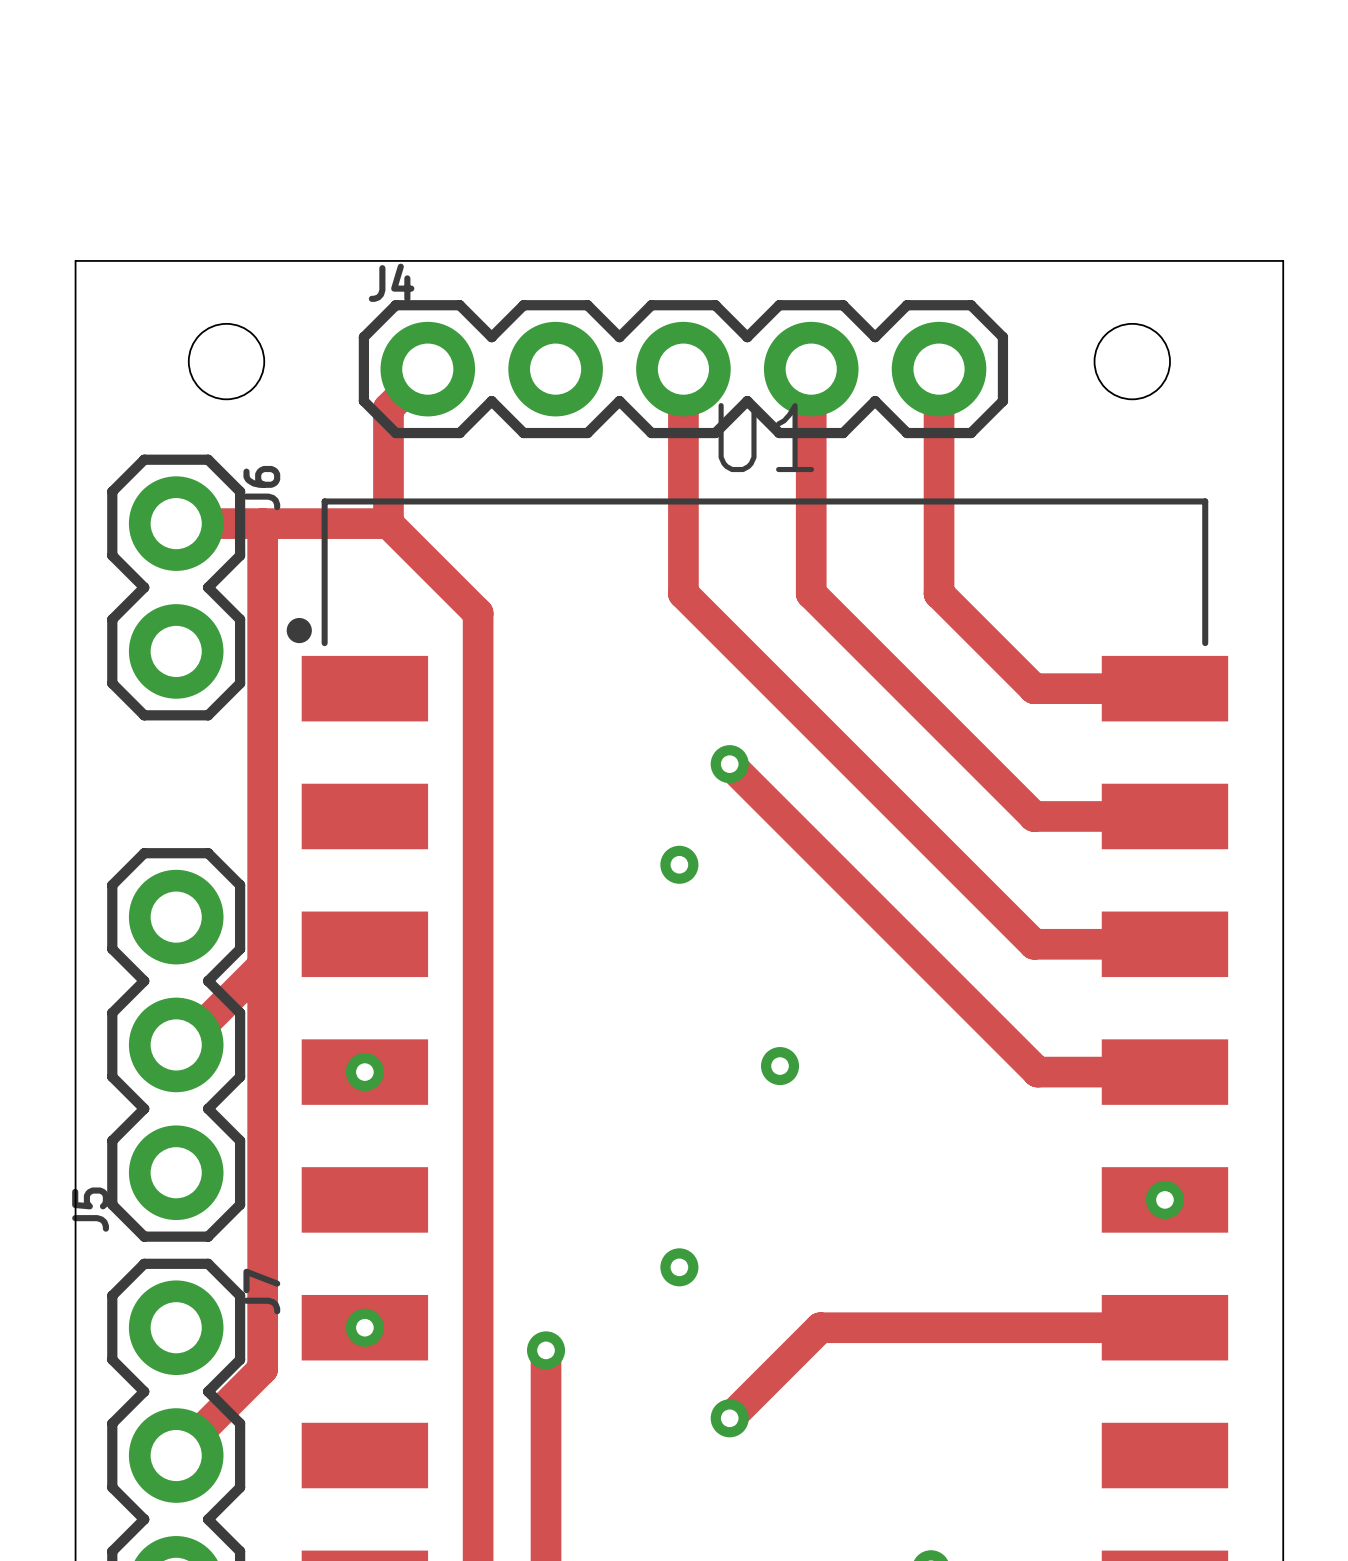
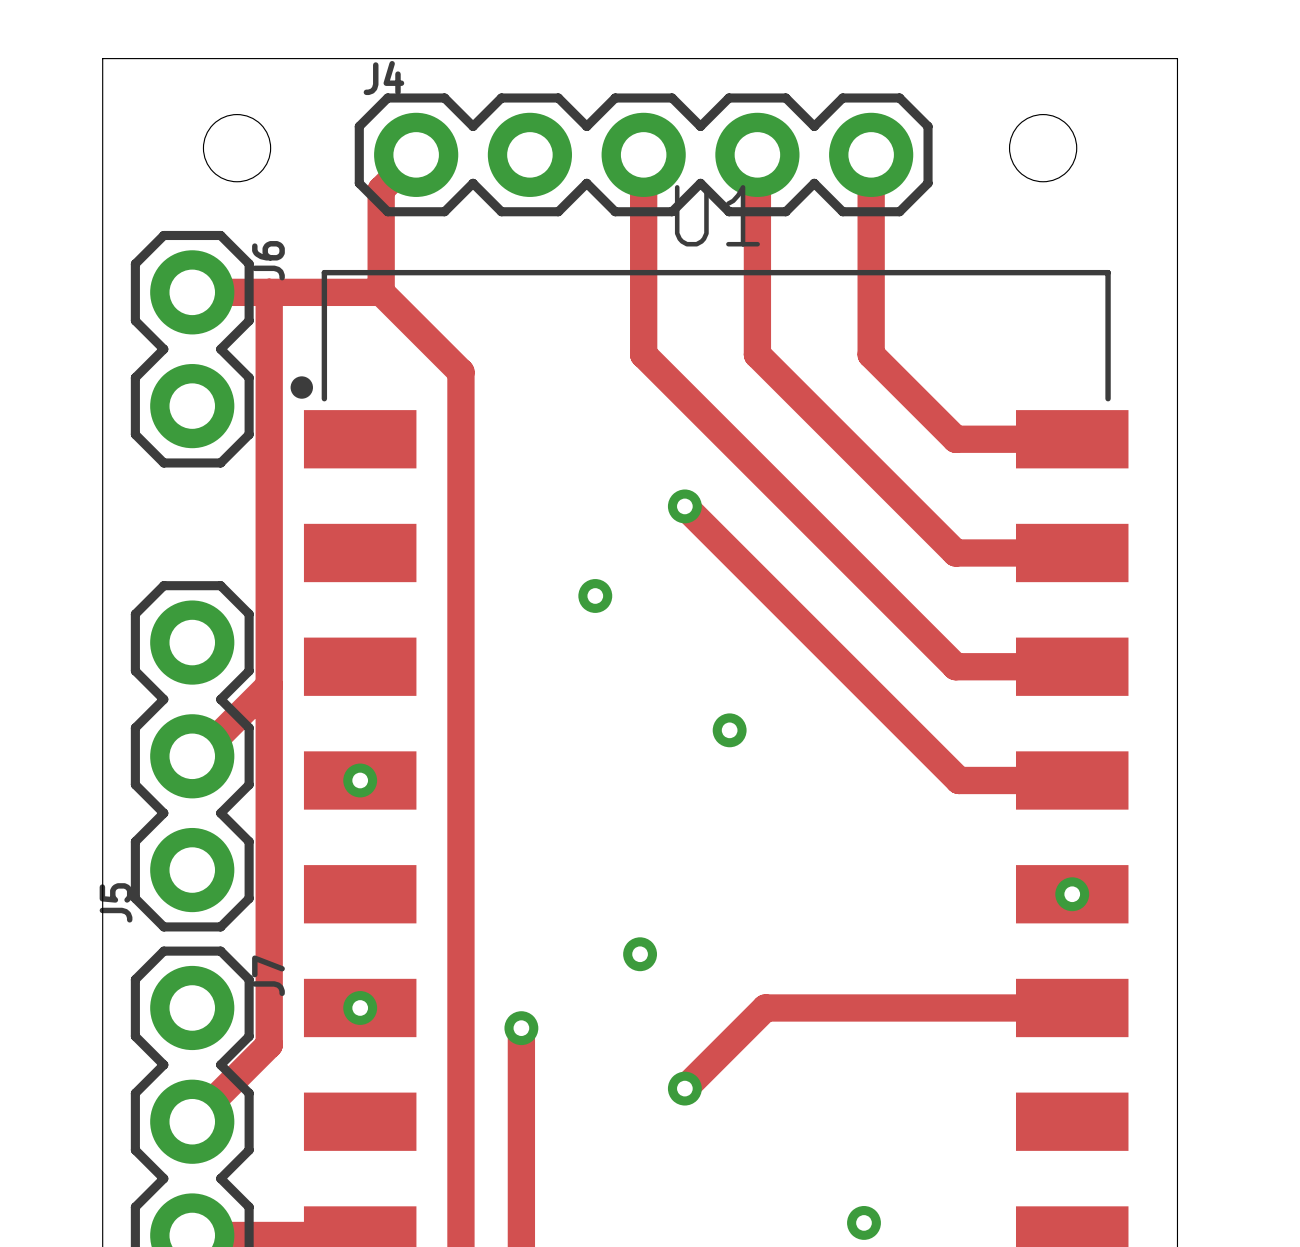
via position: (679, 864) -> (595, 595)
via position: (780, 1066) -> (729, 730)

